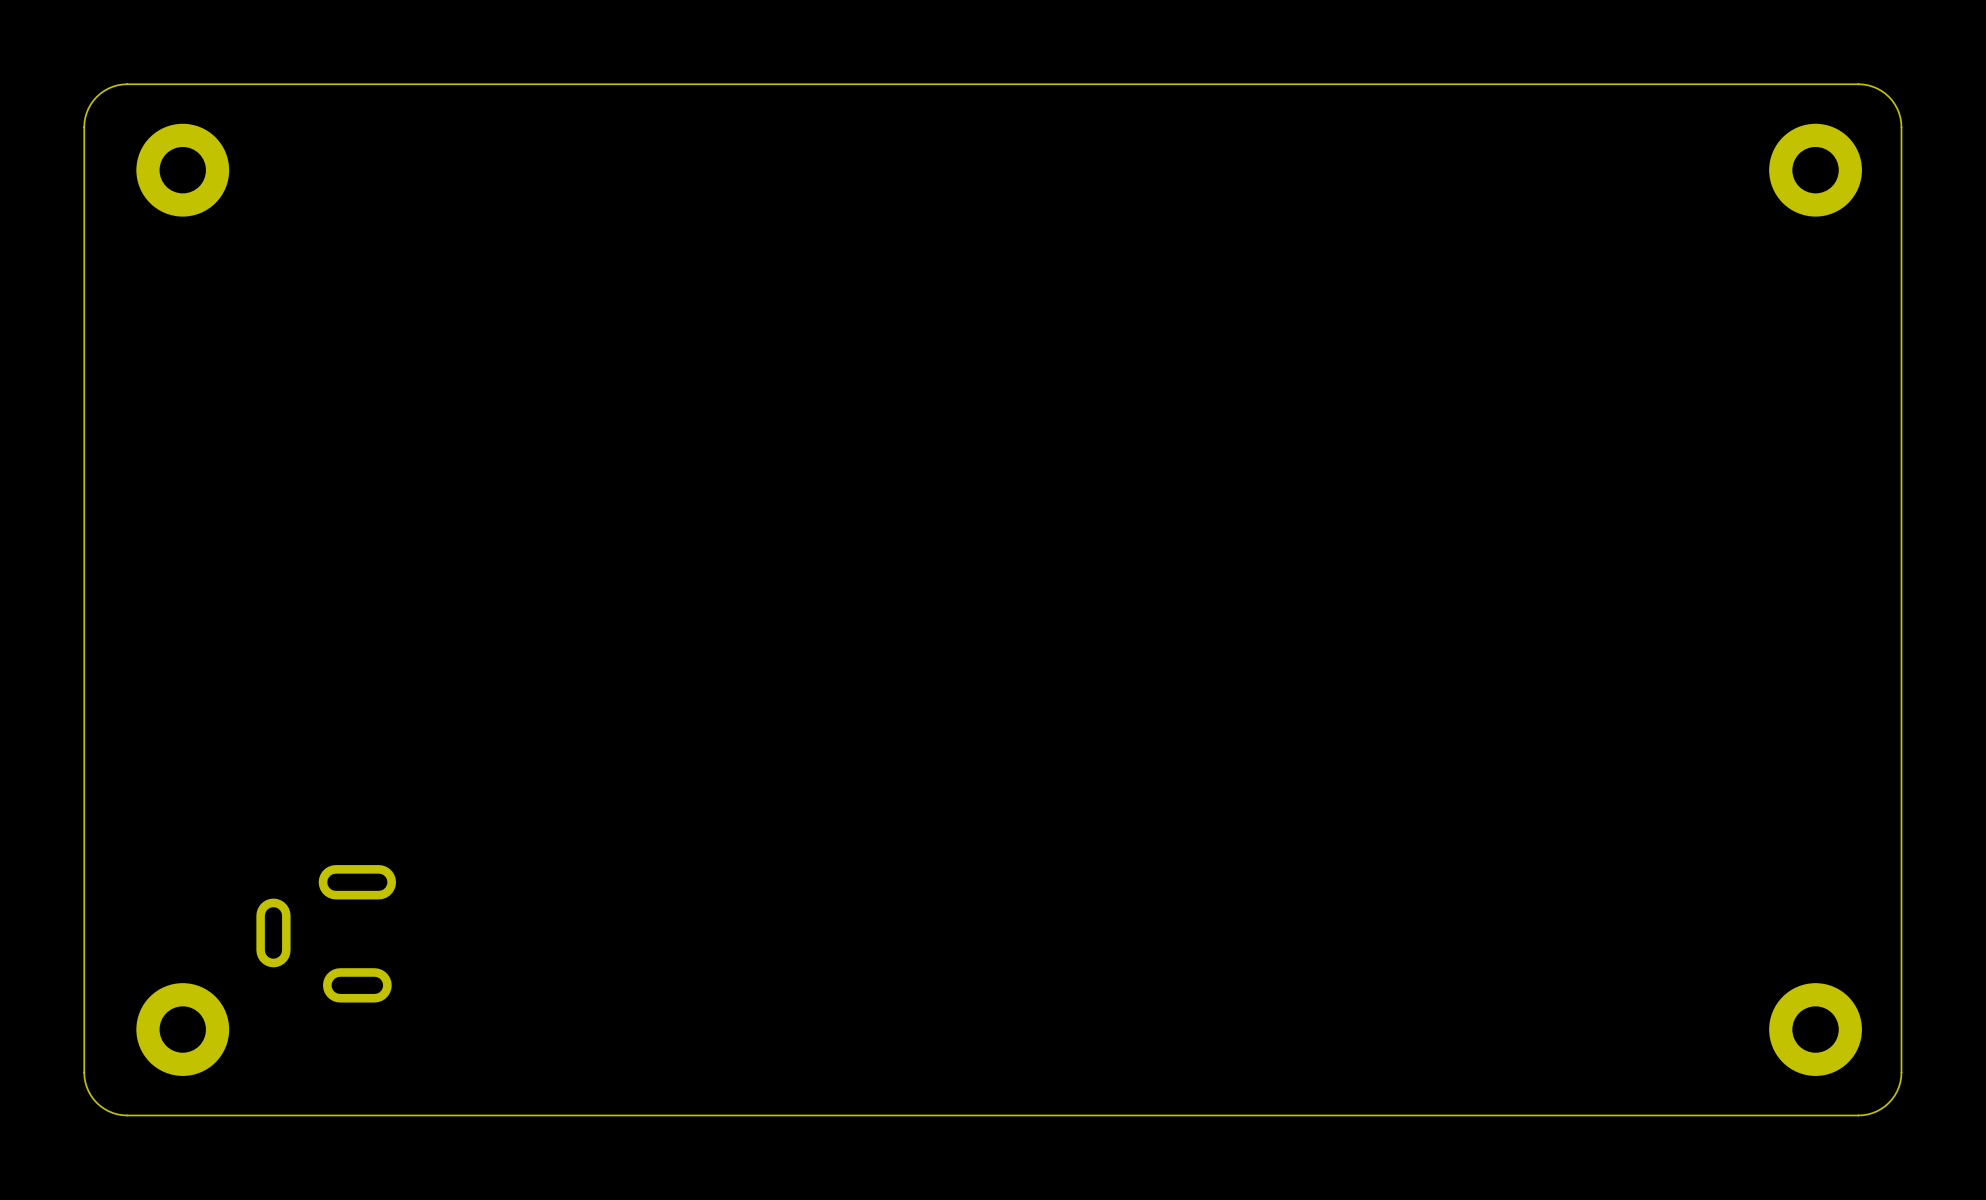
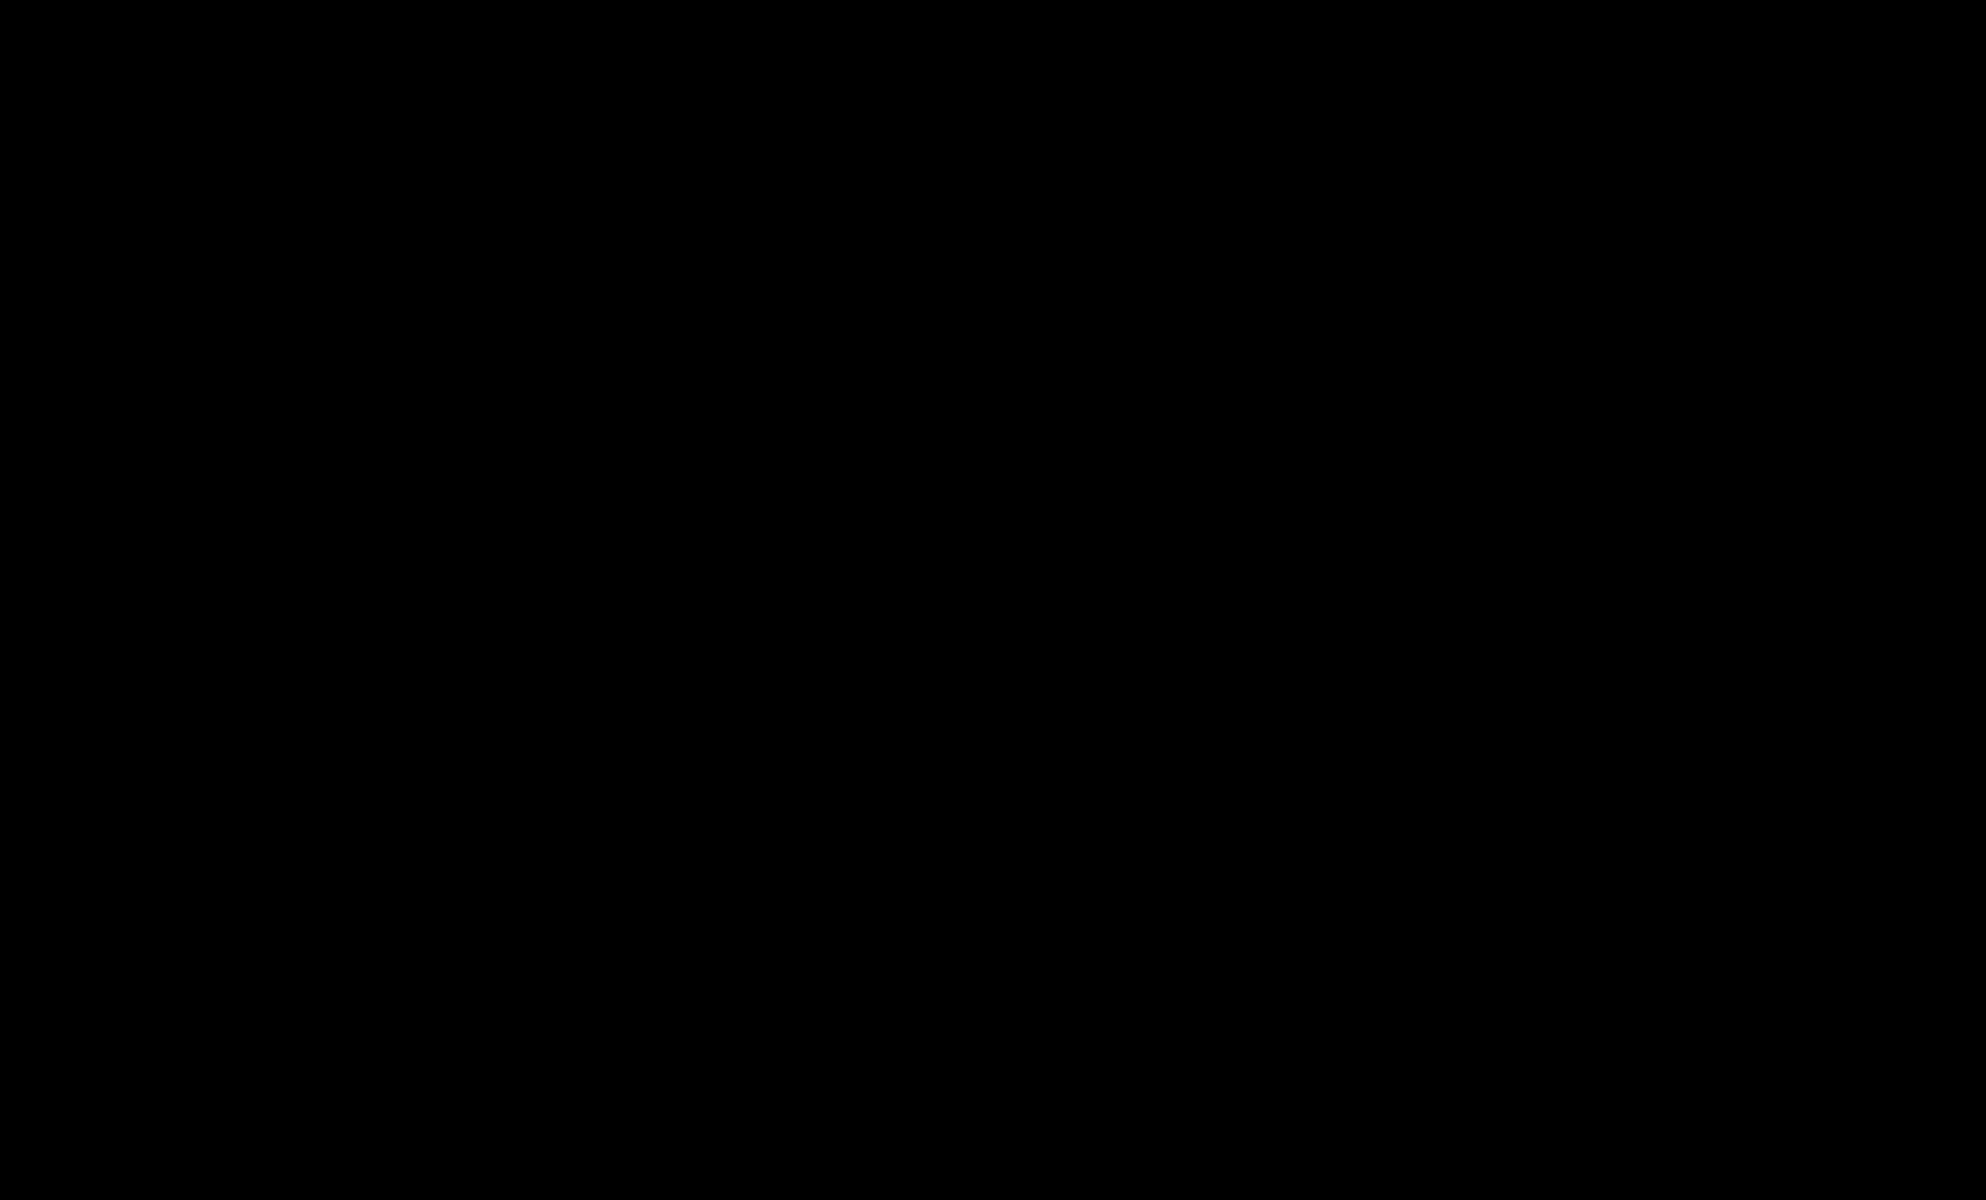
board edge: (1858, 84) (127, 84) (113, 86) (104, 90) (96, 96) (88, 108) (84, 127) (84, 1072) (85, 1082) (90, 1095) (104, 1108) (113, 1113) (127, 1115) (1858, 1115) (1872, 1113) (1881, 1108) (1894, 1095) (1899, 1086) (1901, 1072) (1901, 127) (1897, 108) (1888, 96) (1872, 86) (1858, 84) -> none
part: (182, 170) -> none
part: (1815, 170) -> none
part: (326, 933) -> none
part: (182, 1029) -> none
part: (1815, 1029) -> none

